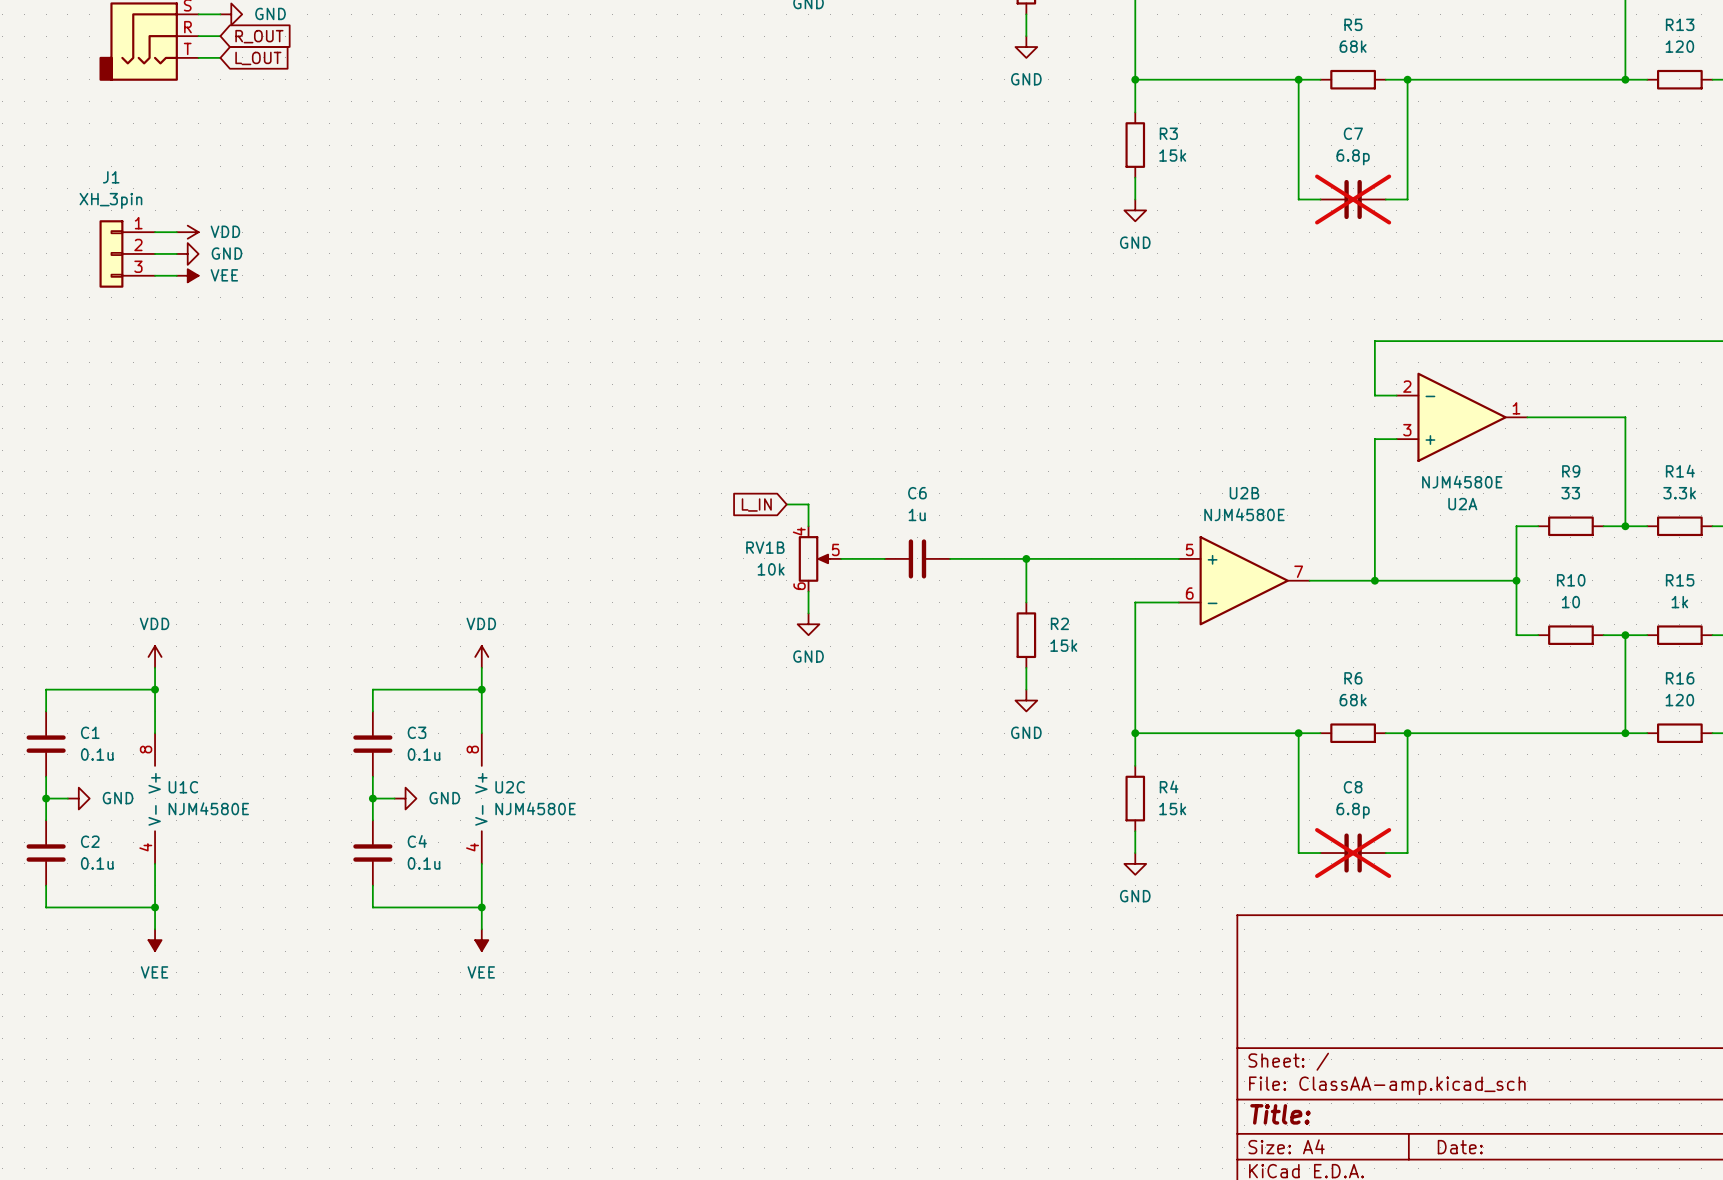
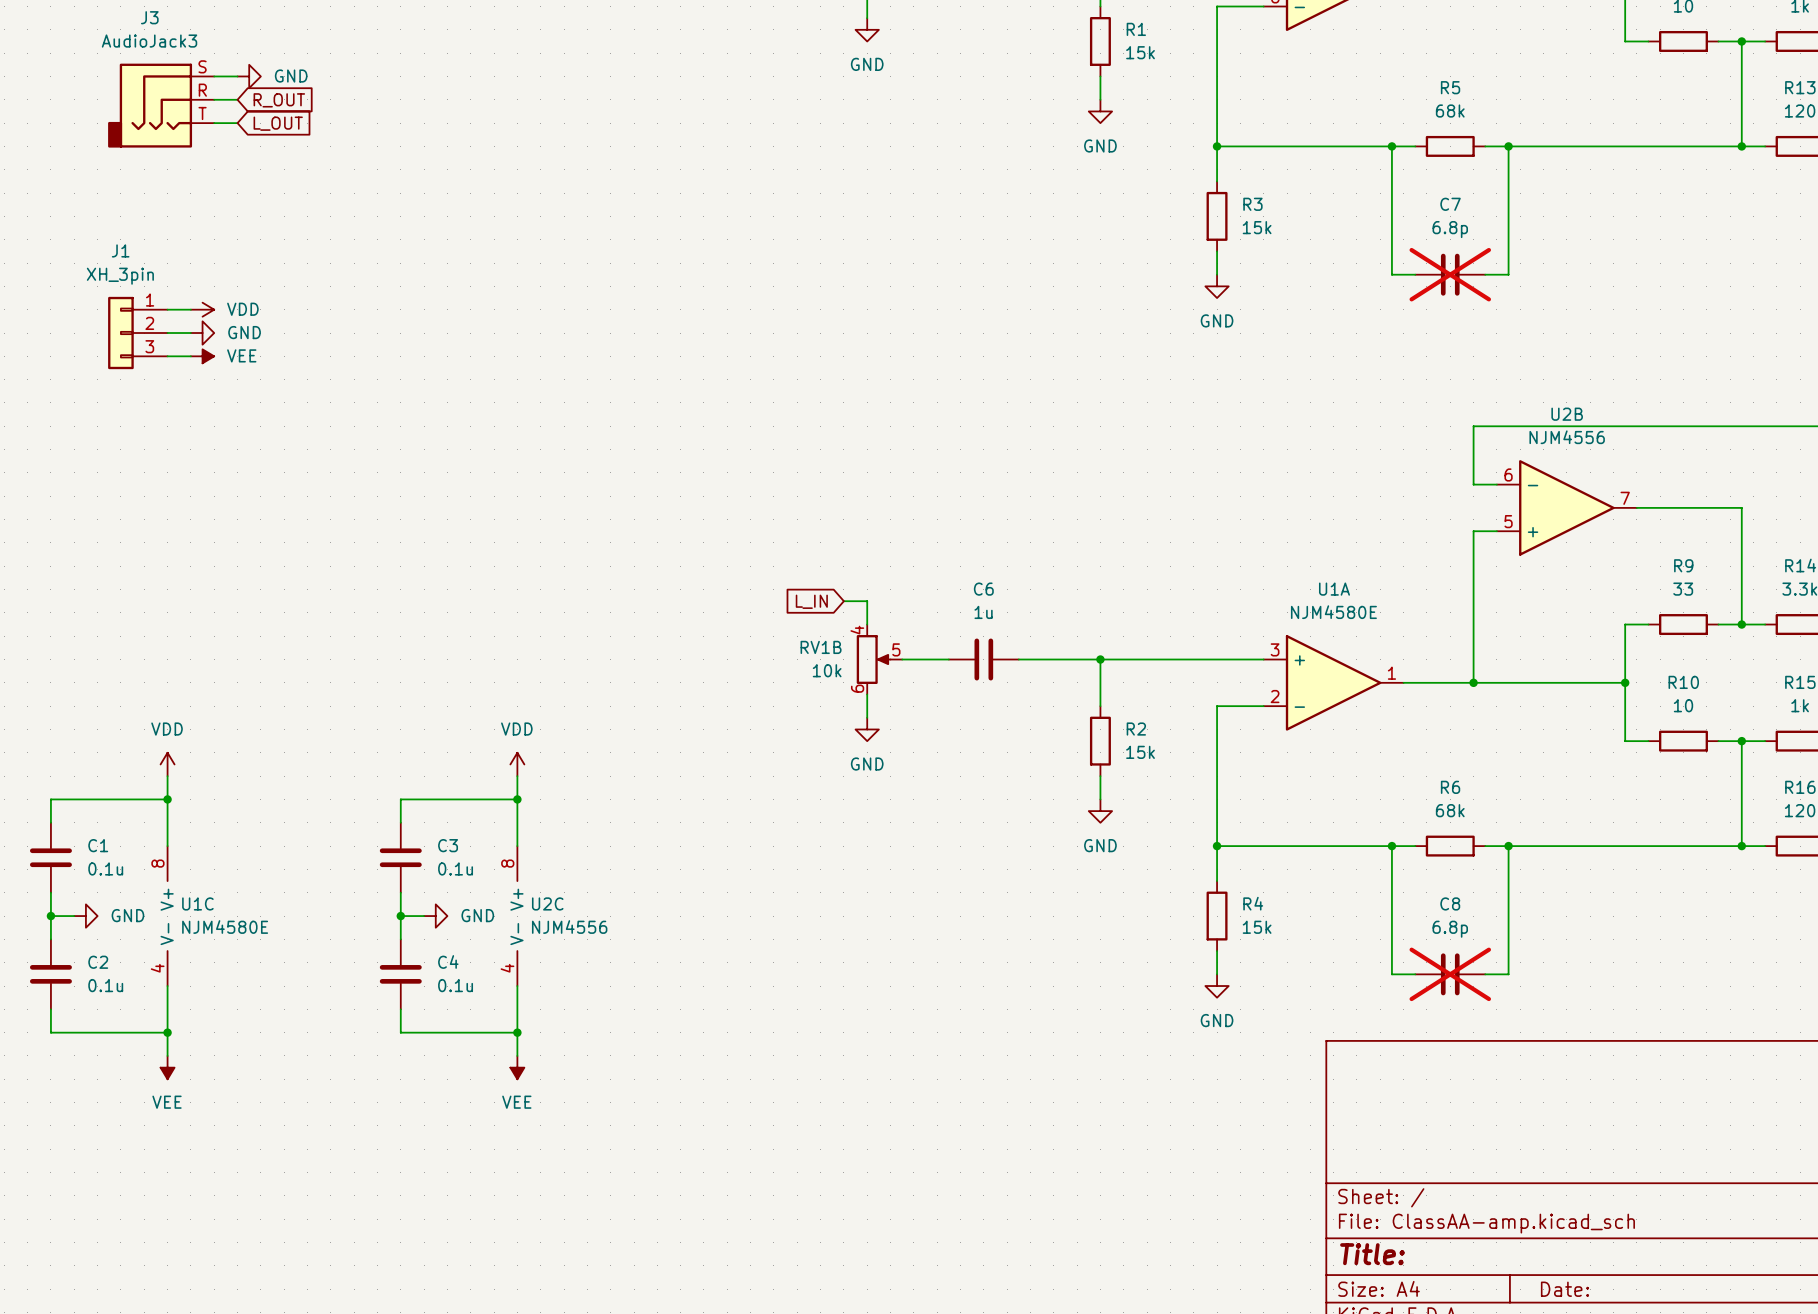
U2A: NJM4580E (1462, 417) -> none
U2B value: NJM4580E (1244, 514) -> NJM4556 (1567, 437)
U2B flip: as is (1244, 580) -> up-down (1566, 507)
U2B position: (1244, 580) -> (1566, 507)
U1A: none -> NJM4580E (1333, 682)
U2C value: NJM4580E (535, 808) -> NJM4556 (569, 926)

